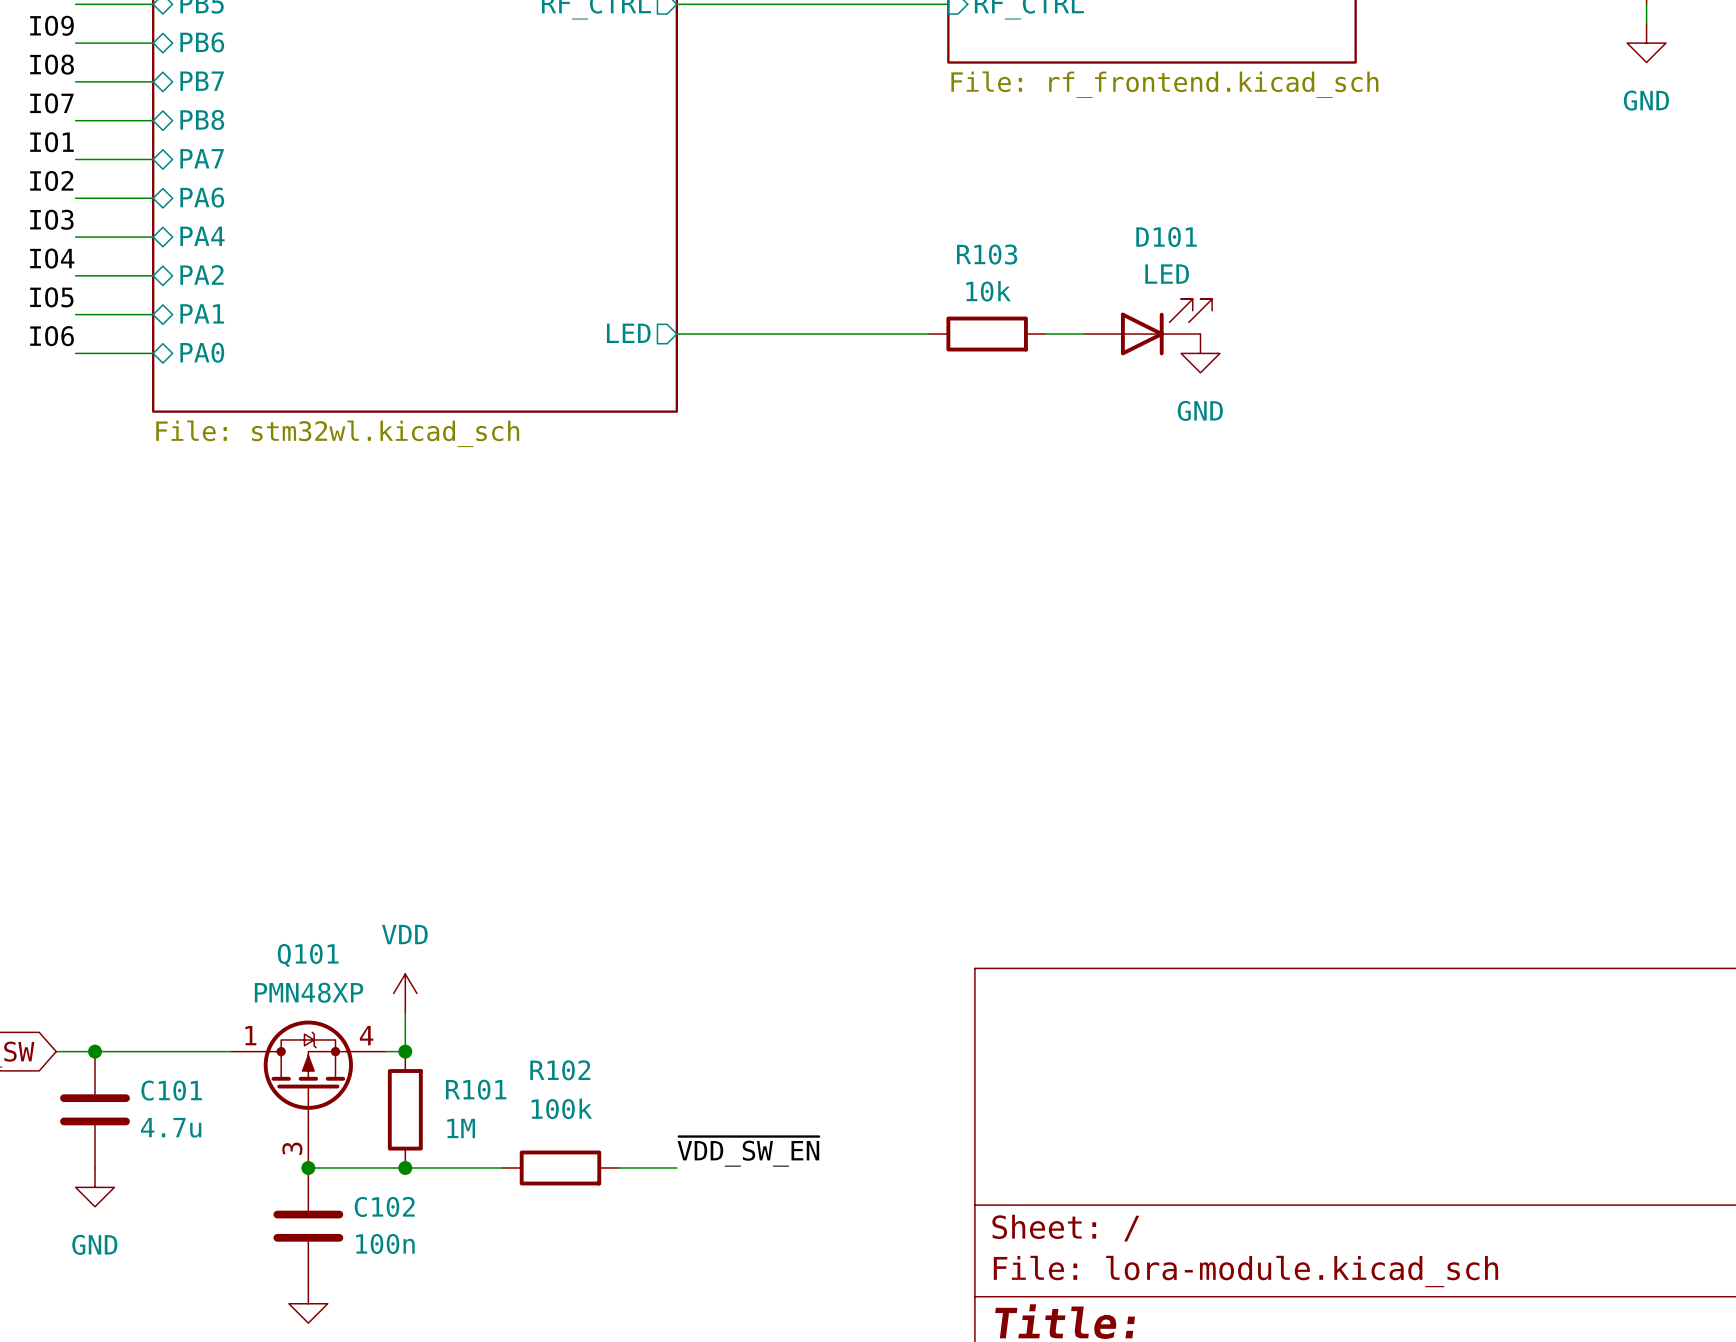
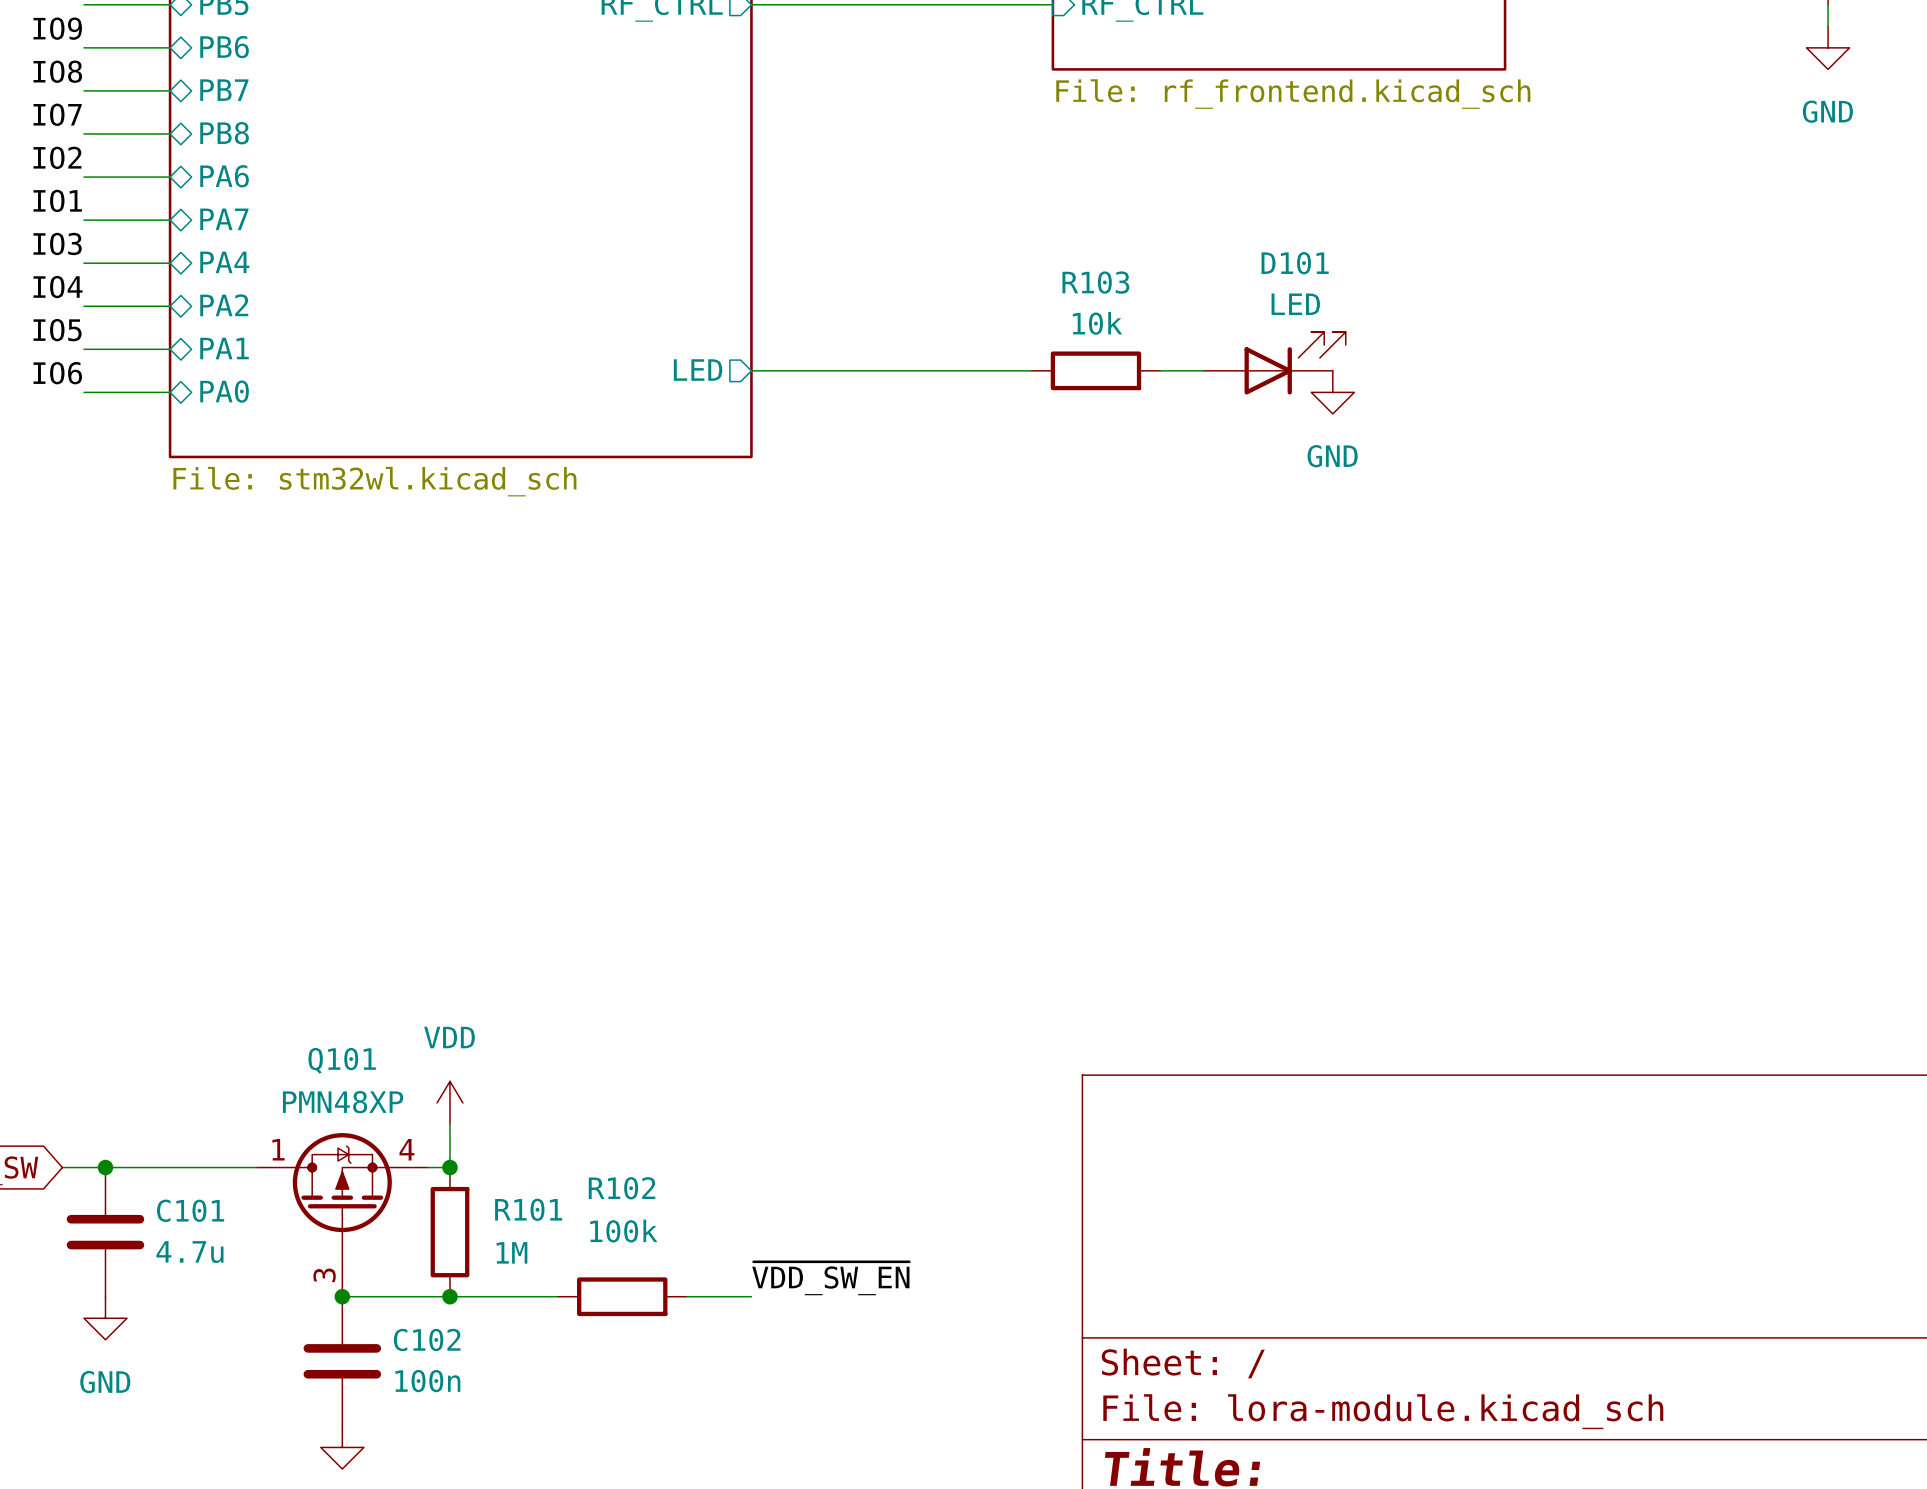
label: IO1 (51, 142) -> IO2 (57, 157)
sheet pin: PA7 (202, 158) -> PA6 (224, 176)
label: IO2 (51, 180) -> IO1 (57, 200)
sheet pin: PA6 (202, 197) -> PA7 (224, 219)

